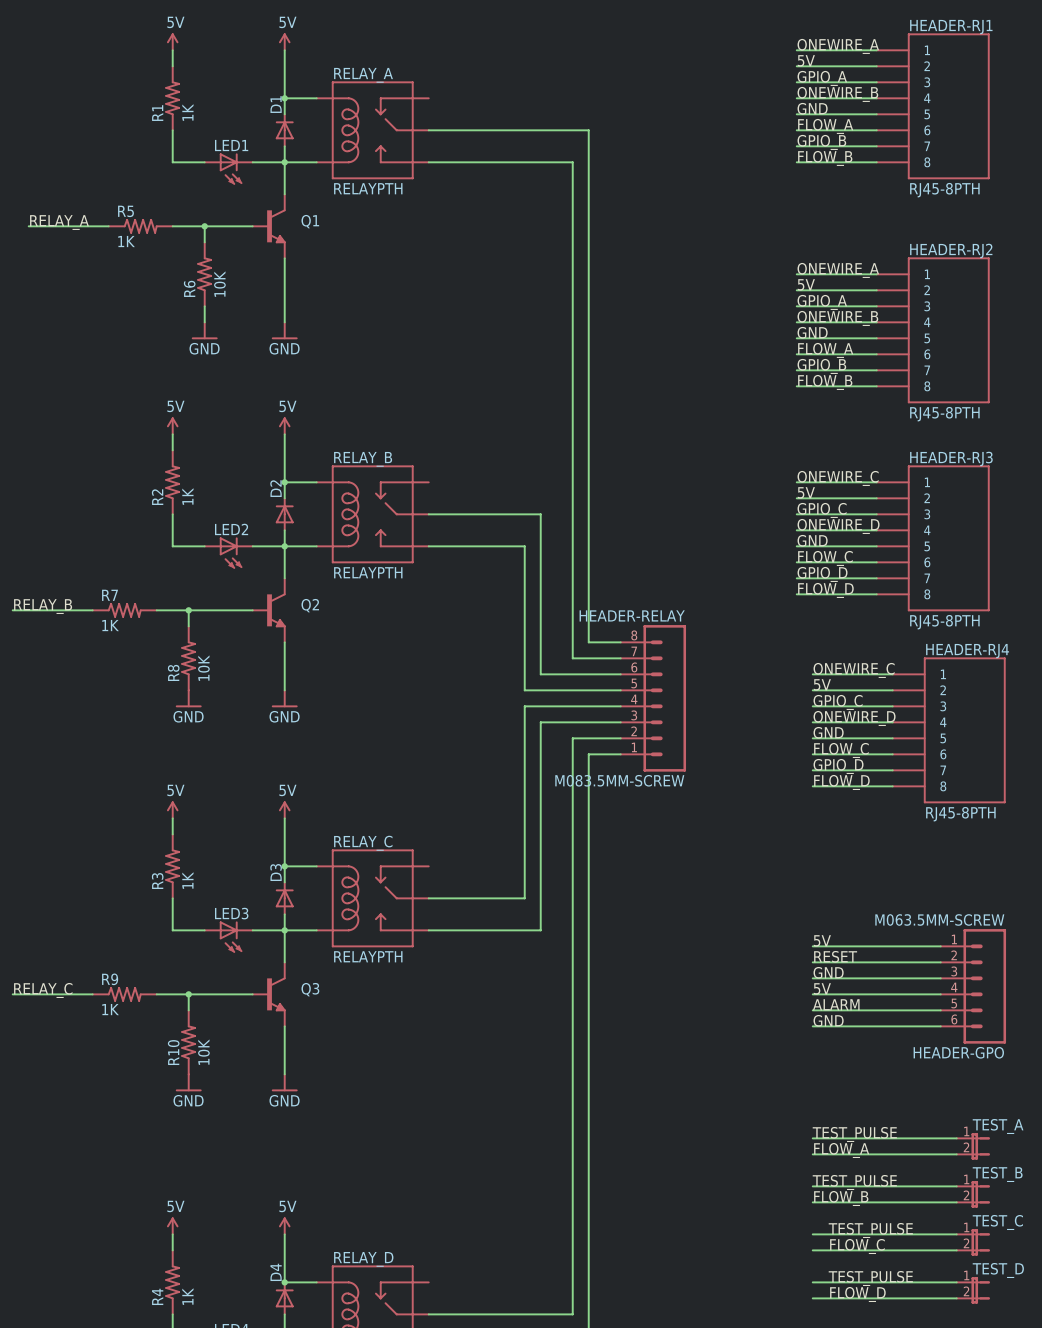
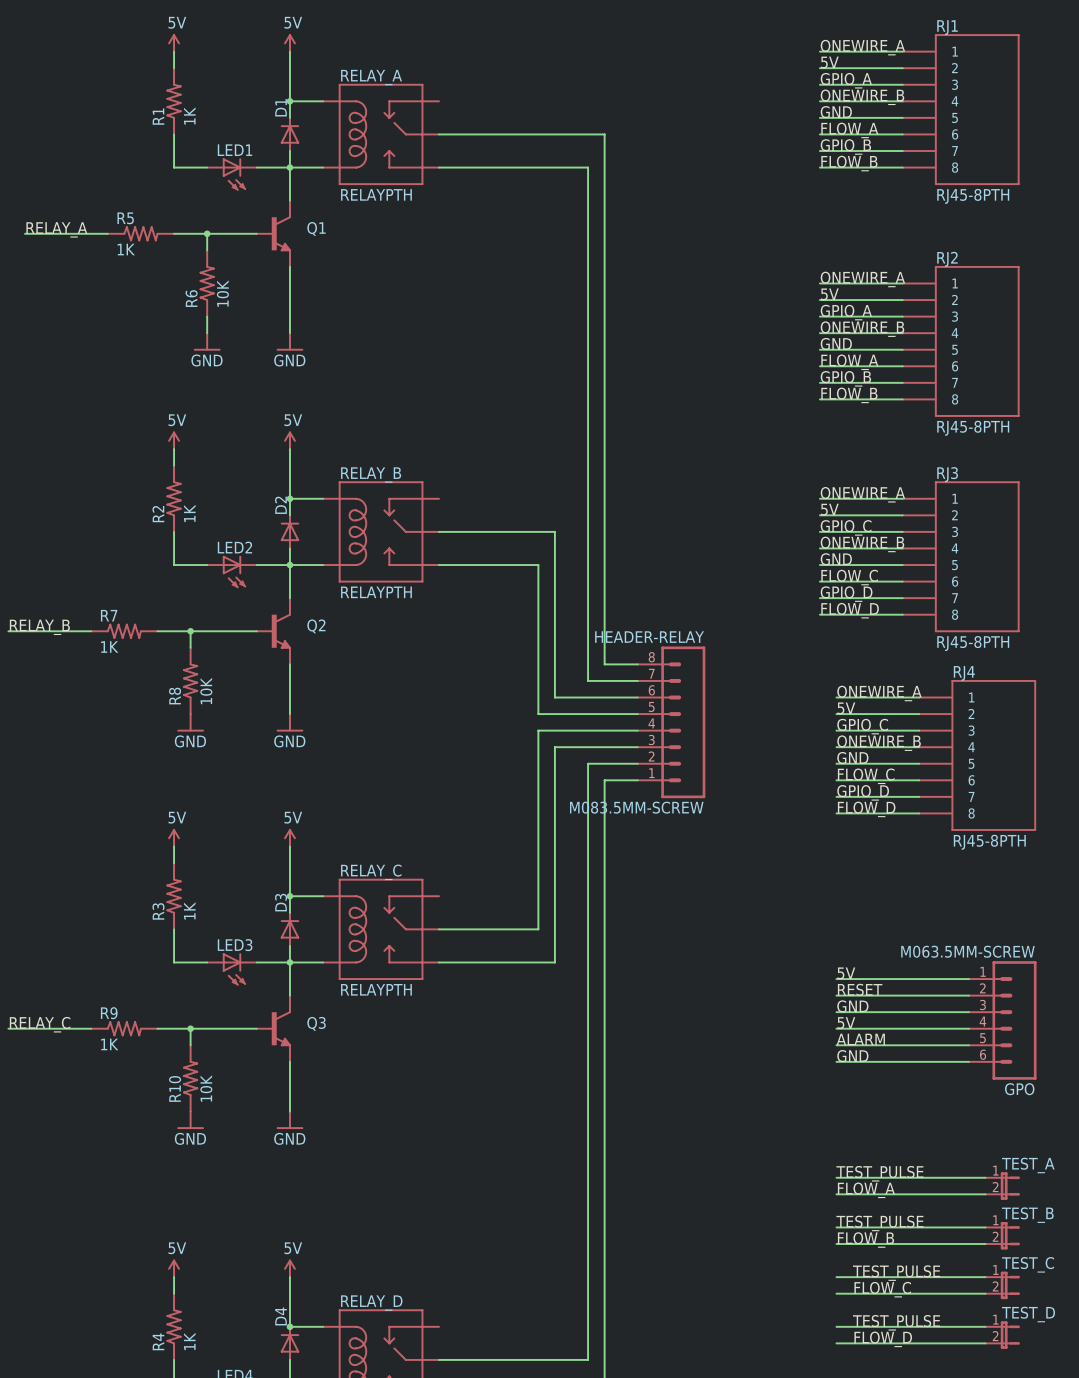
HEADER-RJ1 name: HEADER-RJ1 (951, 27) -> RJ1 (947, 27)
HEADER-RJ2 name: HEADER-RJ2 (951, 250) -> RJ2 (947, 259)
HEADER-RJ3 name: HEADER-RJ3 (951, 458) -> RJ3 (947, 474)
label: ONEWIRE_C (838, 478) -> ONEWIRE_A (862, 494)
label: ONEWIRE_D (838, 526) -> ONEWIRE_B (862, 544)
HEADER-RJ4 name: HEADER-RJ4 (967, 651) -> RJ4 (964, 673)
label: ONEWIRE_C (854, 670) -> ONEWIRE_A (879, 693)
label: ONEWIRE_D (854, 718) -> ONEWIRE_B (879, 743)
HEADER-GPO name: HEADER-GPO (958, 1052) -> GPO (1019, 1089)

